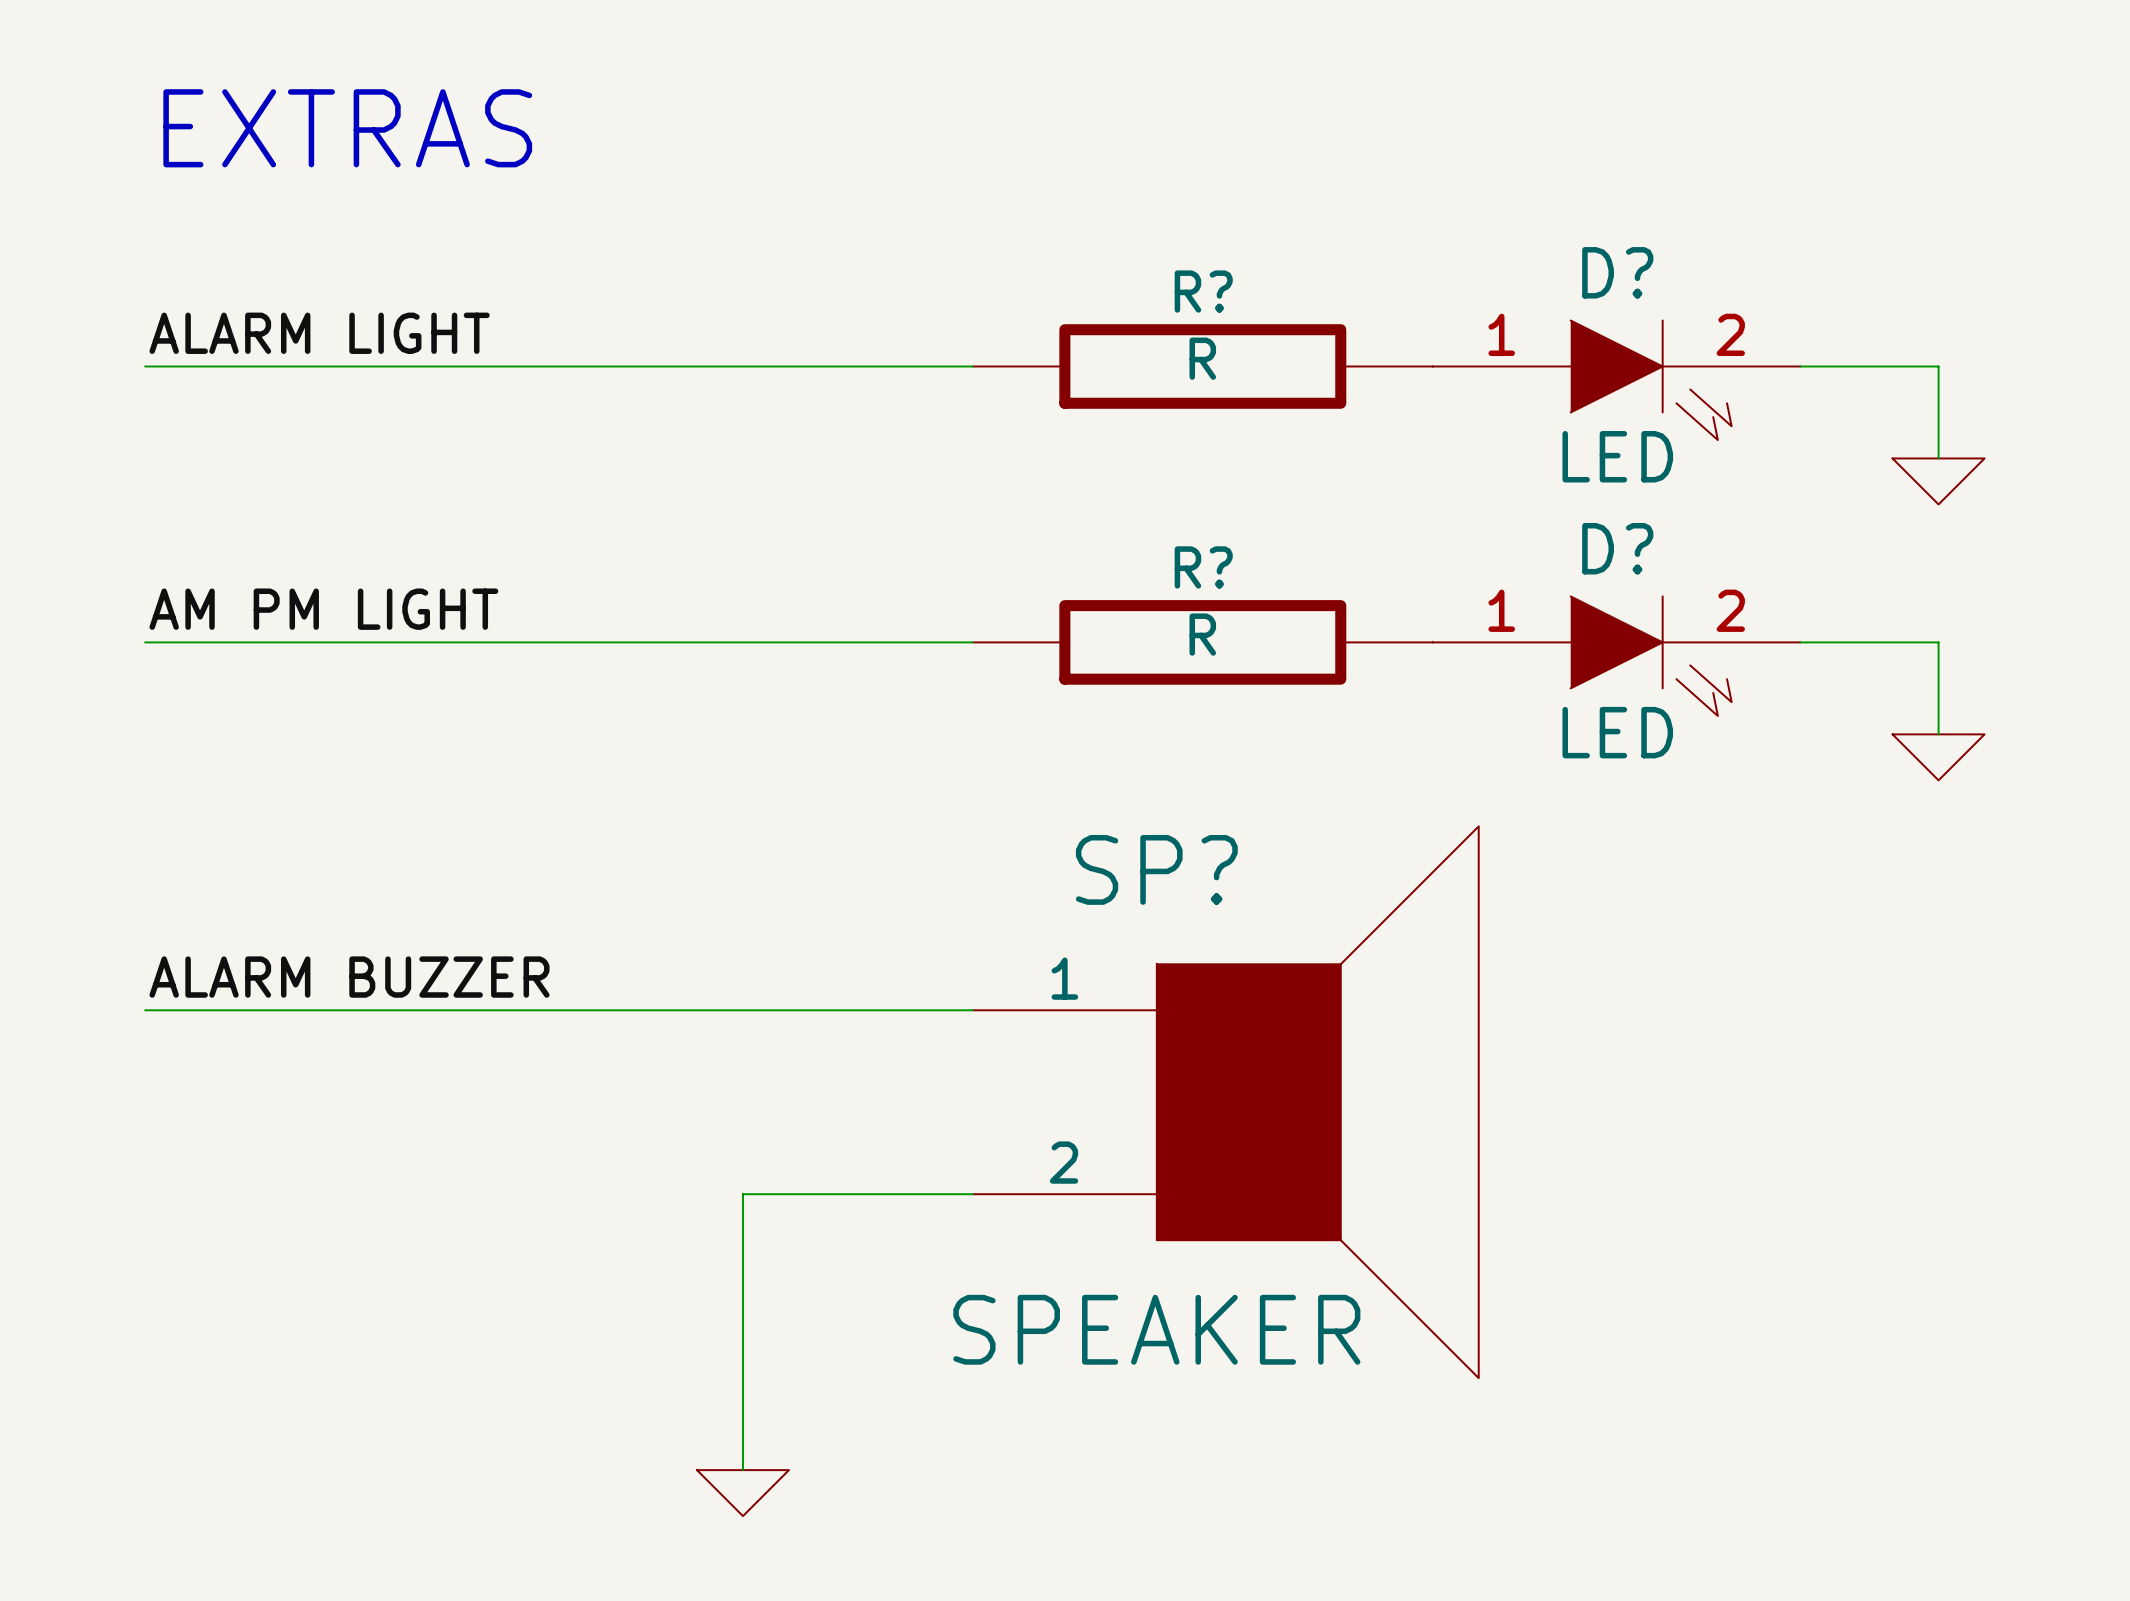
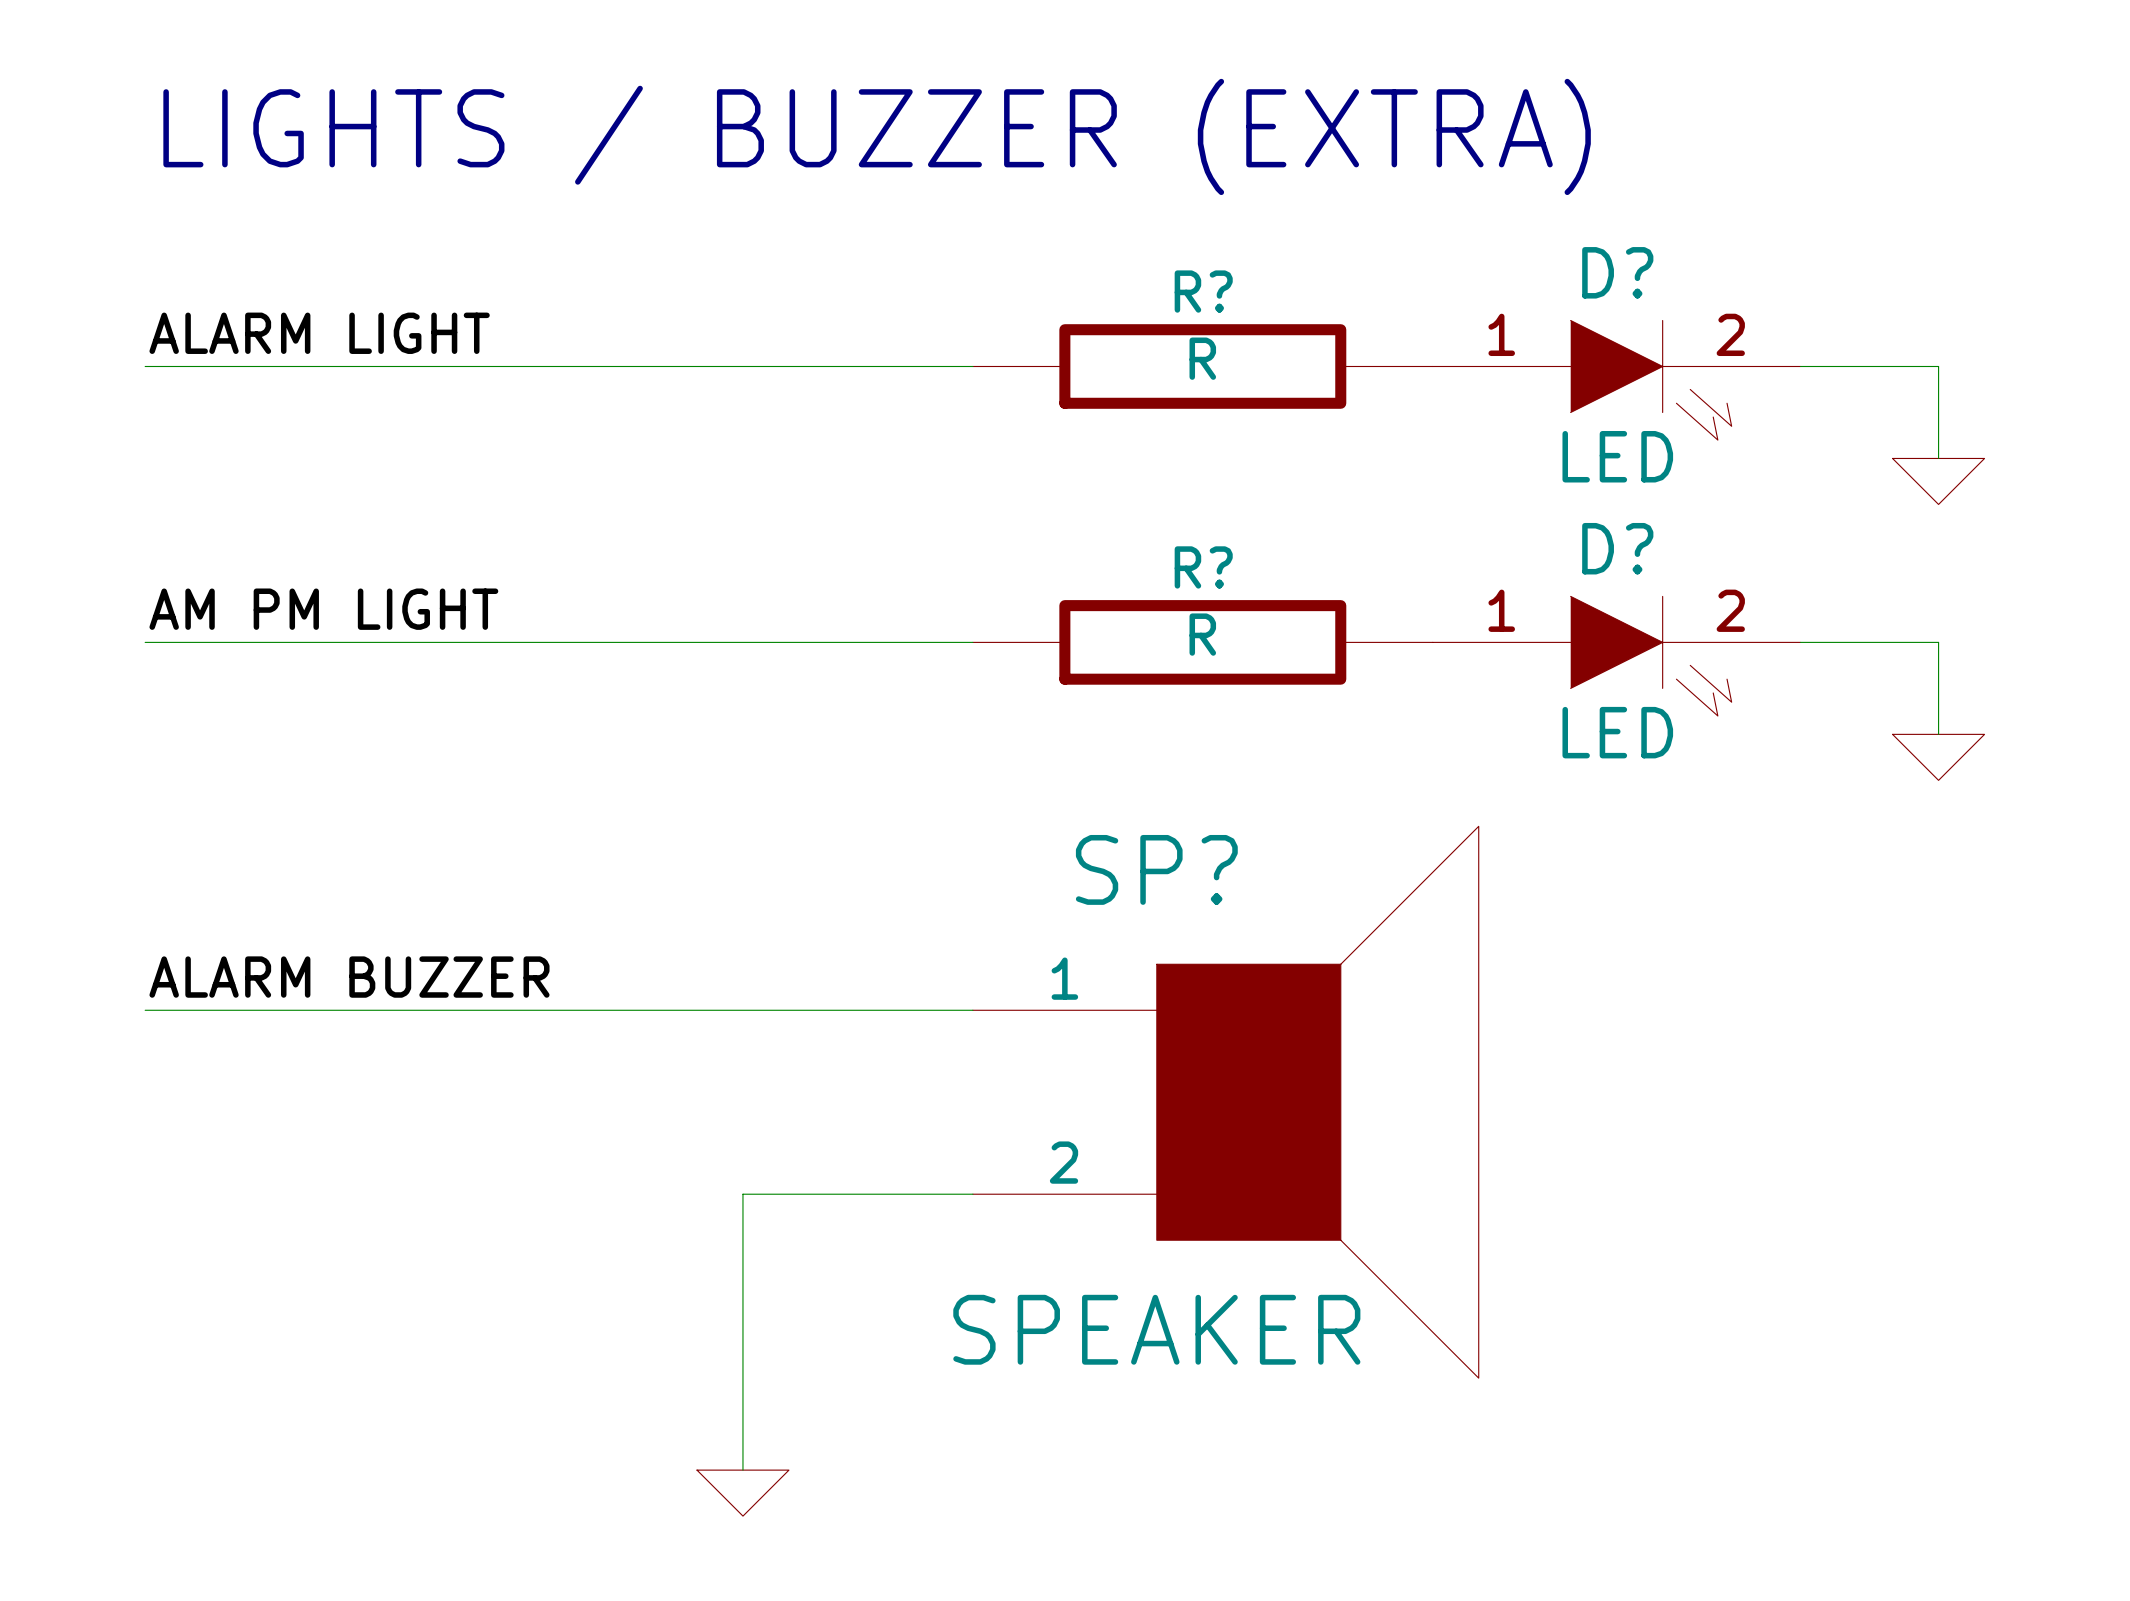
text: EXTRAS (347, 128) -> LIGHTS / BUZZER (EXTRA) (877, 136)

